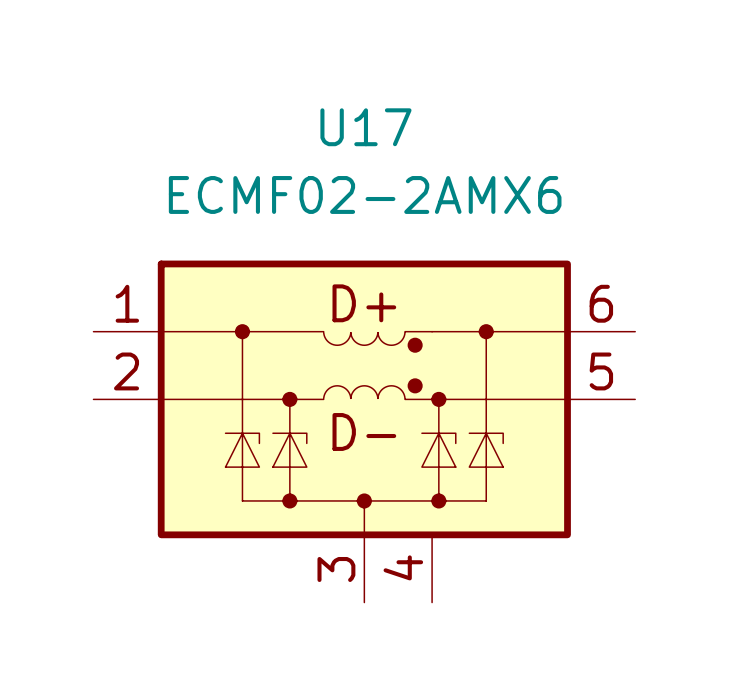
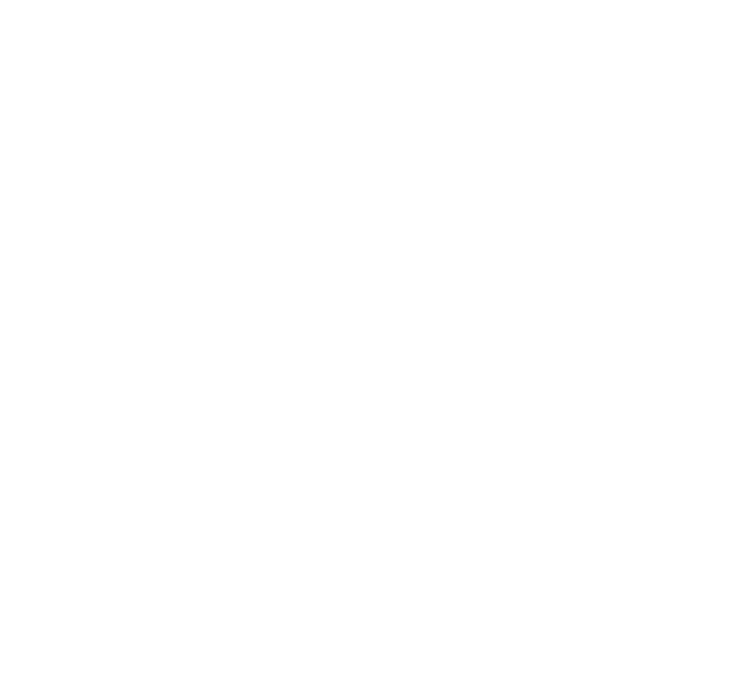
U17: ECMF02-2AMX6 (364, 431) -> none

